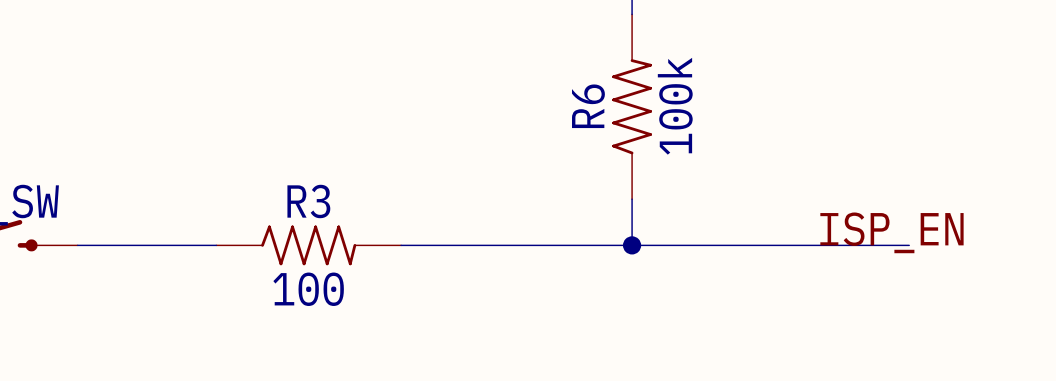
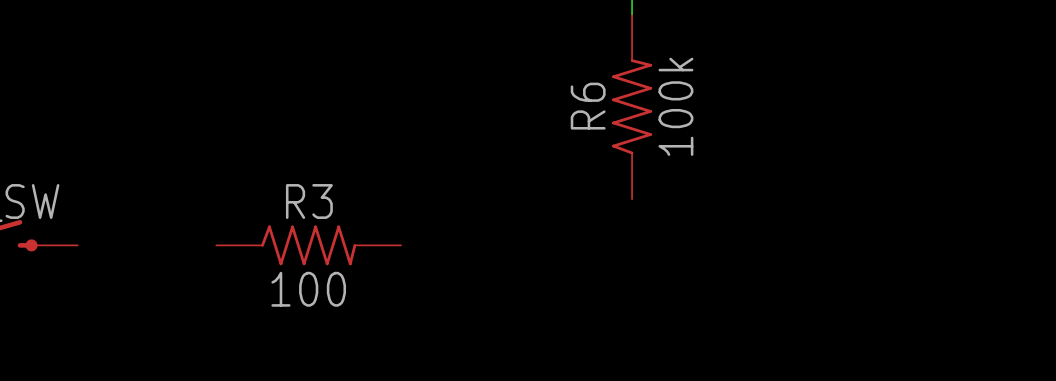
wire: (632, 199) (632, 245) -> none
label: ISP_EN (891, 232) -> none
wire: (77, 245) (216, 245) -> none
wire: (401, 245) (909, 245) -> none
junction: (632, 245) -> none

